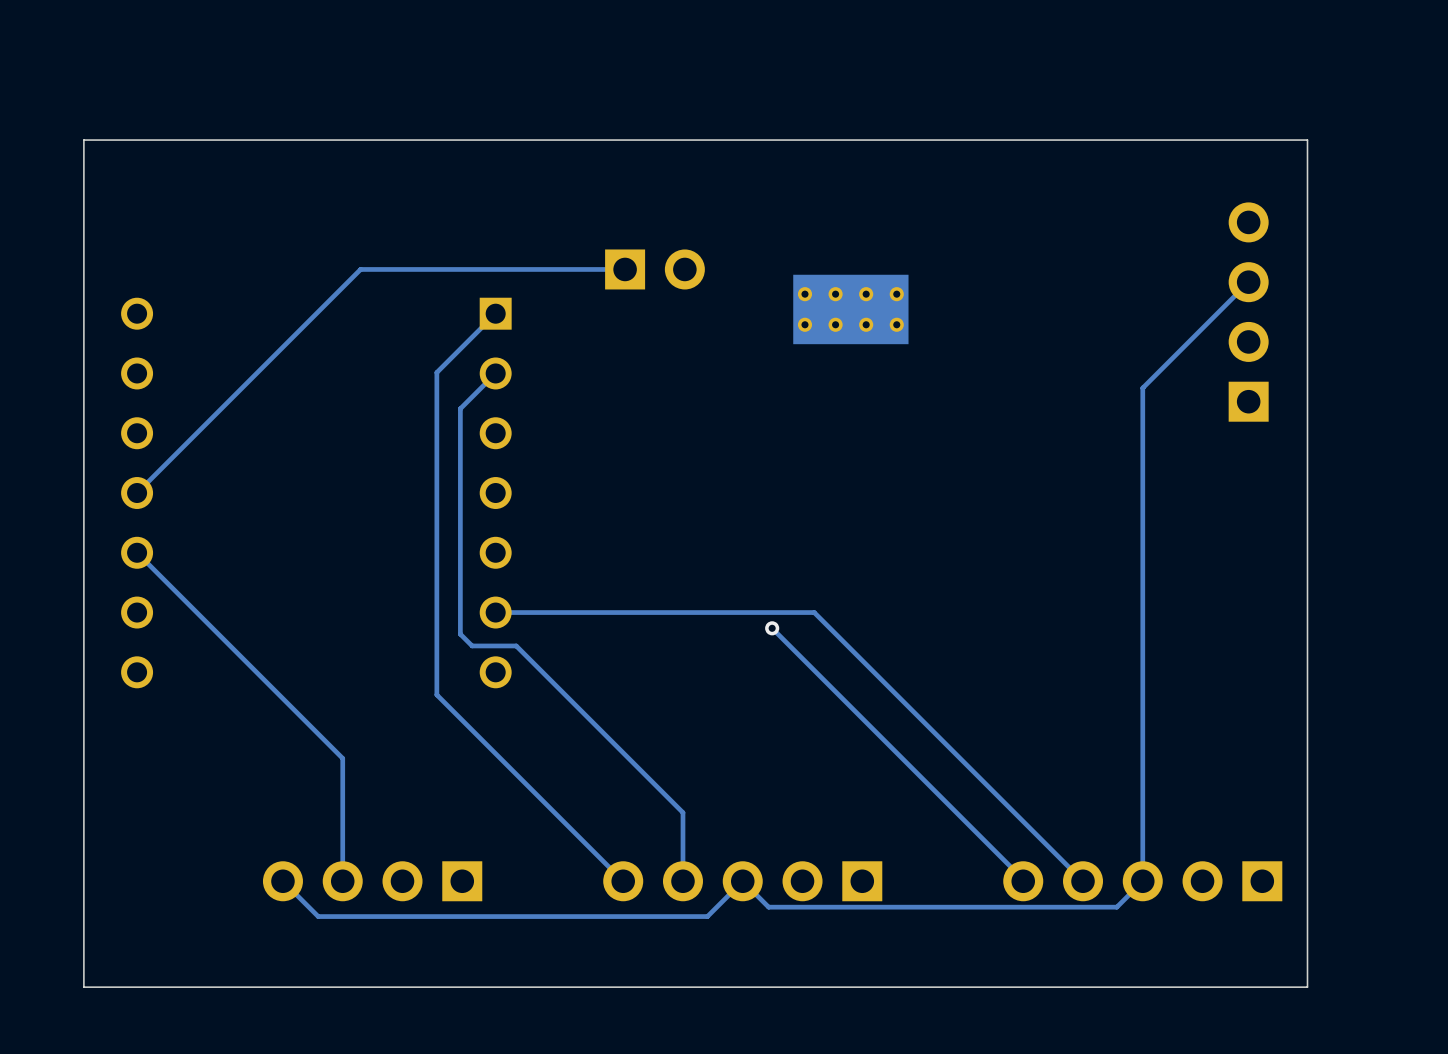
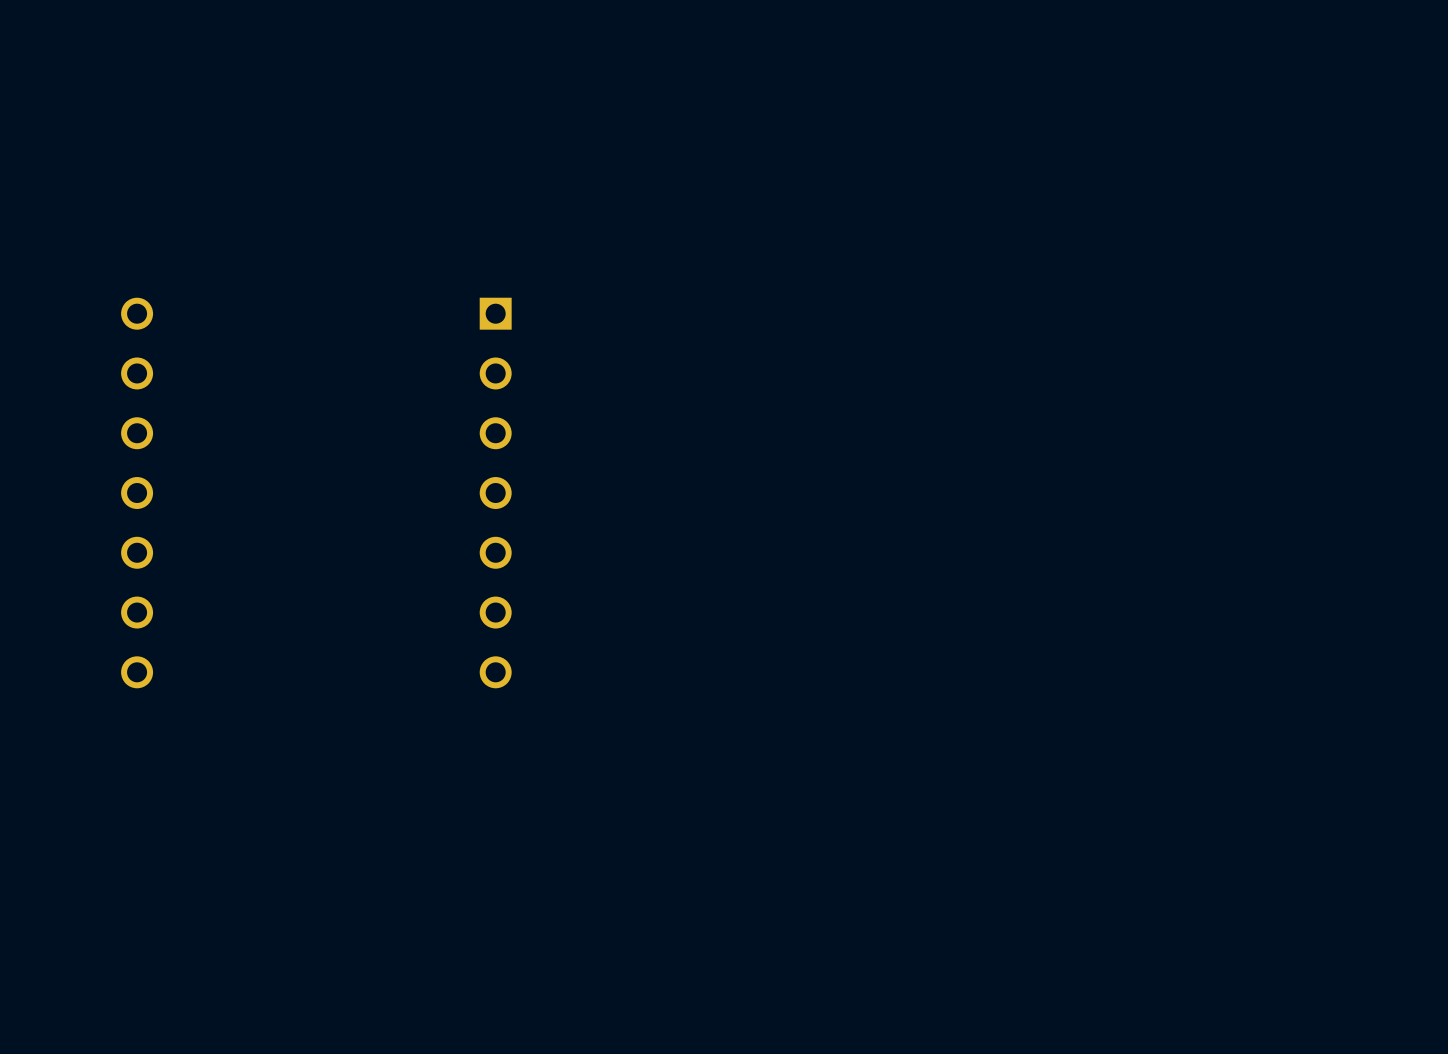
board edge: (1307, 140) (83, 140) (83, 987) (1307, 987) (1307, 140) -> none
track: (625, 269) (360, 269) (137, 493) -> none
part: (654, 269) -> none
track: (1248, 282) (1142, 388) (1142, 881) (1116, 907) (768, 907) (742, 881) (707, 916) (318, 916) (282, 881) -> none
part: (850, 309) -> none
part: (1248, 312) -> none
track: (495, 313) (436, 372) (436, 694) (623, 881) -> none
track: (495, 373) (460, 408) (460, 634) (472, 645) (516, 645) (682, 812) (682, 881) -> none
track: (137, 552) (342, 758) (342, 881) -> none
track: (495, 612) (814, 612) (1083, 881) -> none
track: (772, 628) (1023, 881) -> none
via: (772, 628) -> none
part: (372, 881) -> none
part: (742, 881) -> none
part: (1142, 881) -> none

